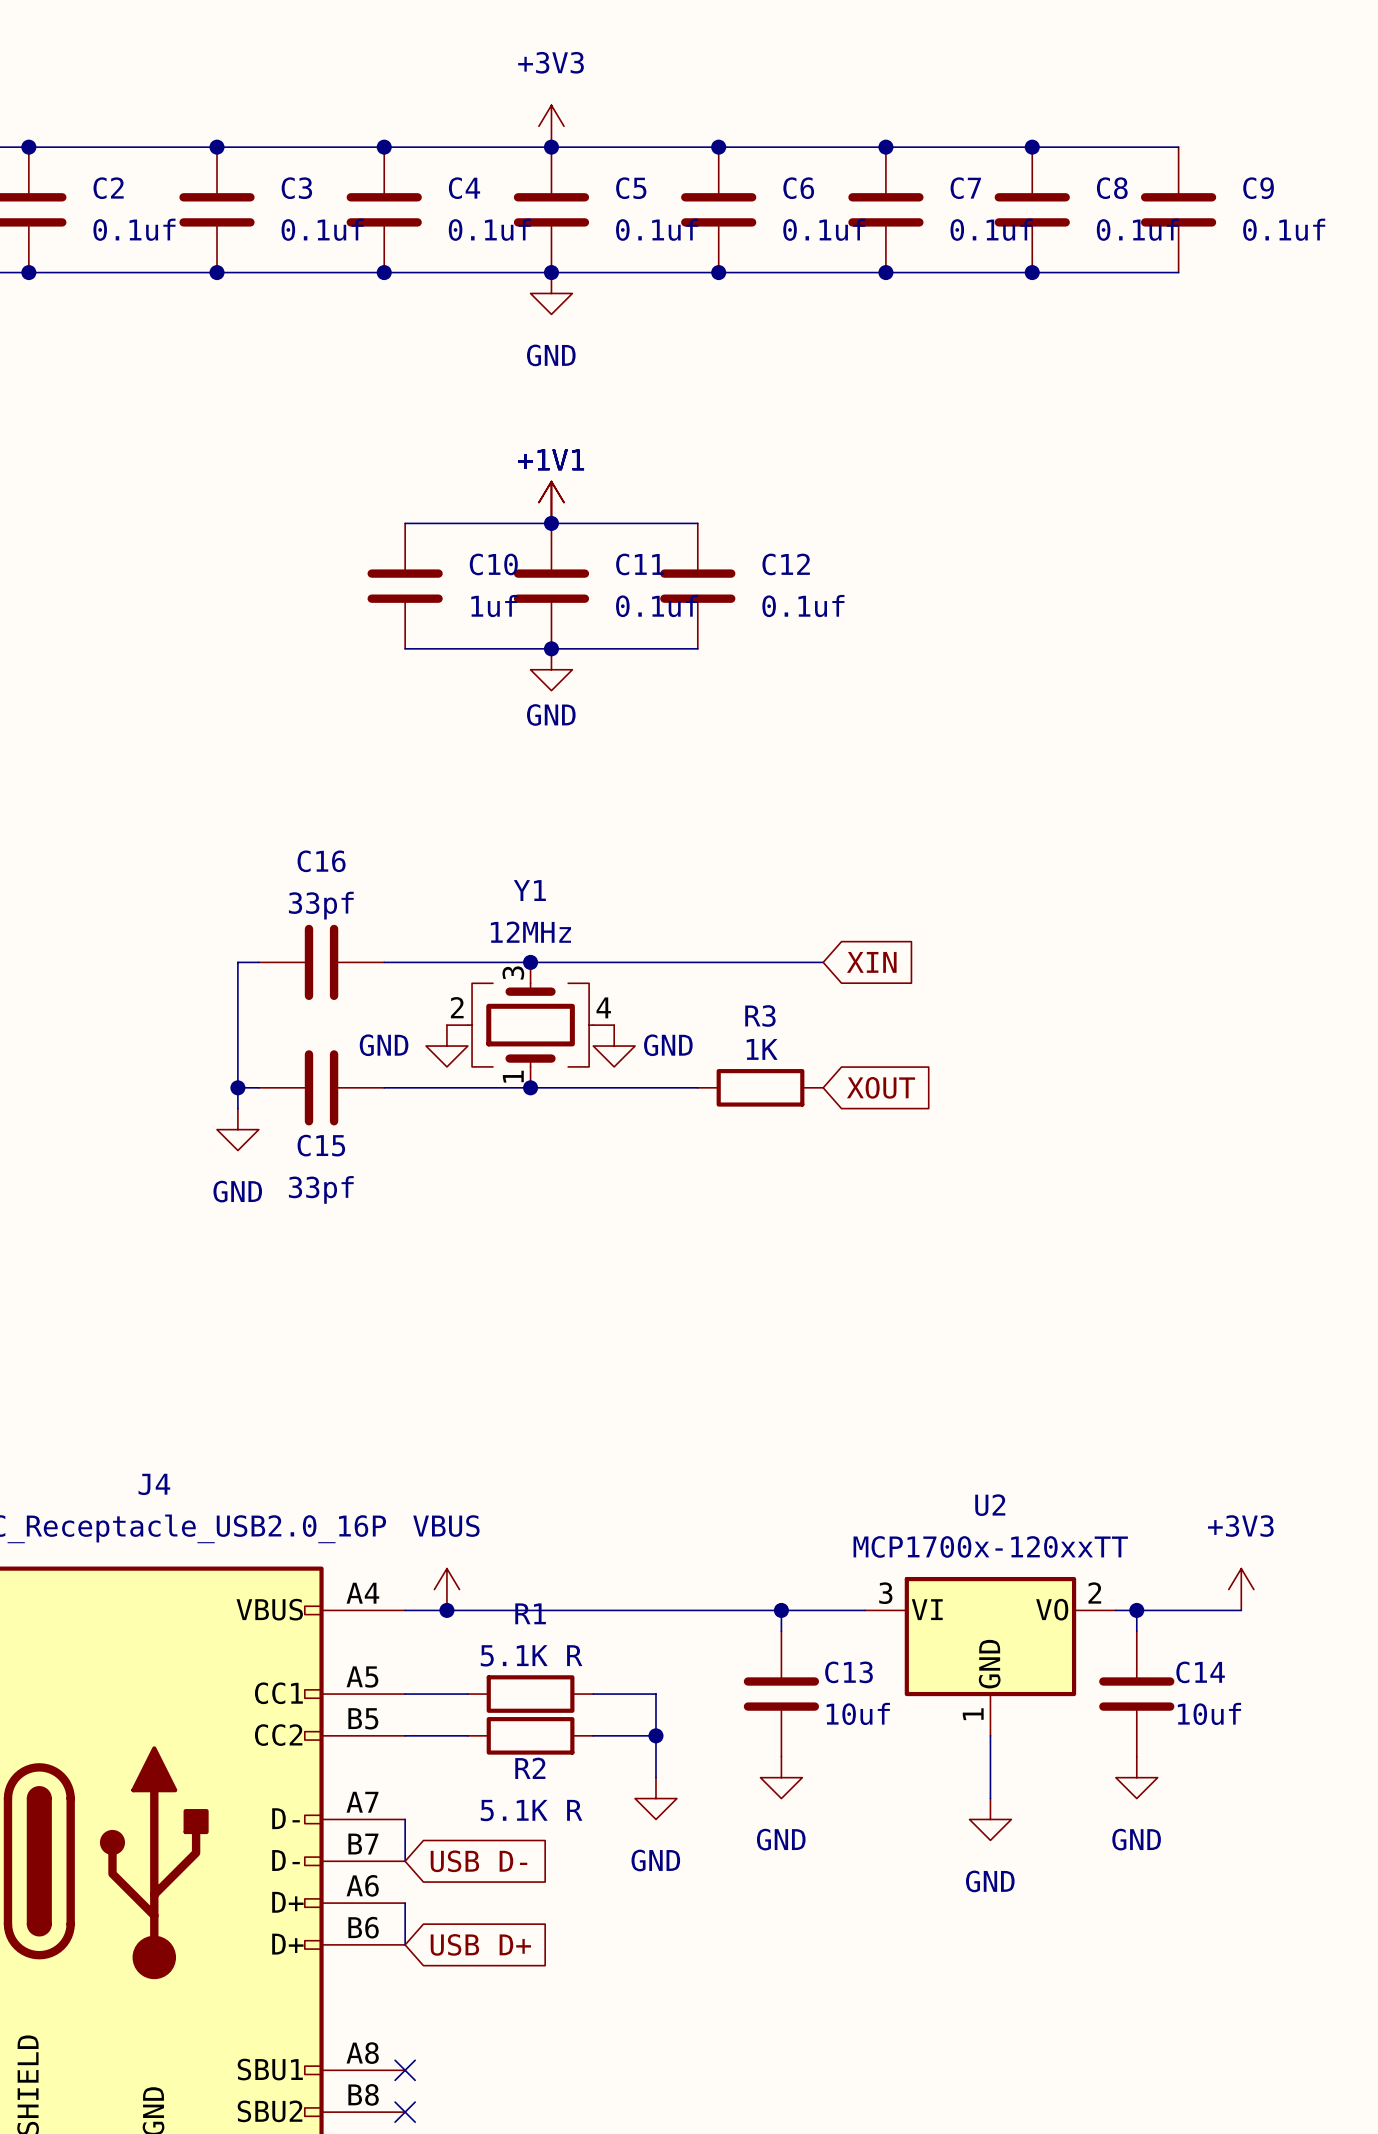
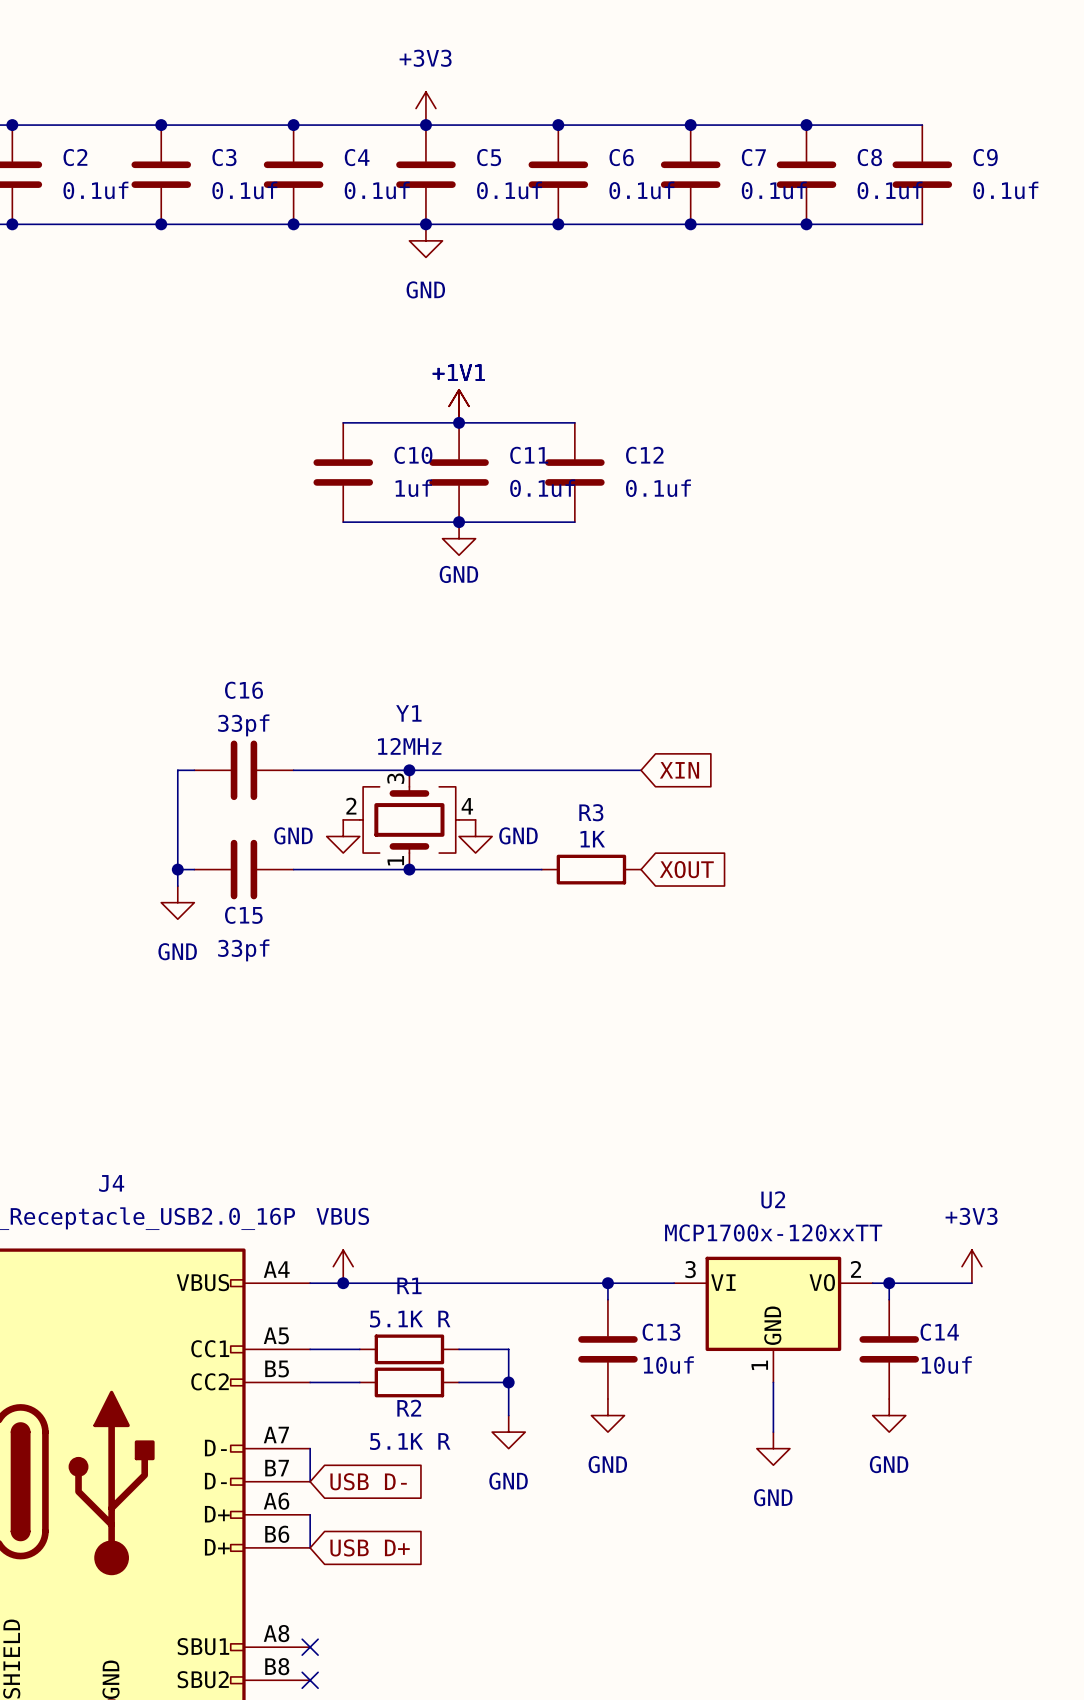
power symbol position: +1V1 (551, 502) -> +1V1 (459, 406)
wire: (405, 523) (446, 523) -> (541, 422) (574, 422)
junction position: (551, 523) -> (459, 422)
C10 position: (405, 586) -> (343, 472)
C11 position: (551, 586) -> (459, 472)
C12 position: (697, 586) -> (574, 472)
wire: (405, 648) (446, 648) -> (541, 522) (574, 522)
junction position: (551, 648) -> (459, 522)
power symbol position: GND (551, 669) -> GND (459, 538)

